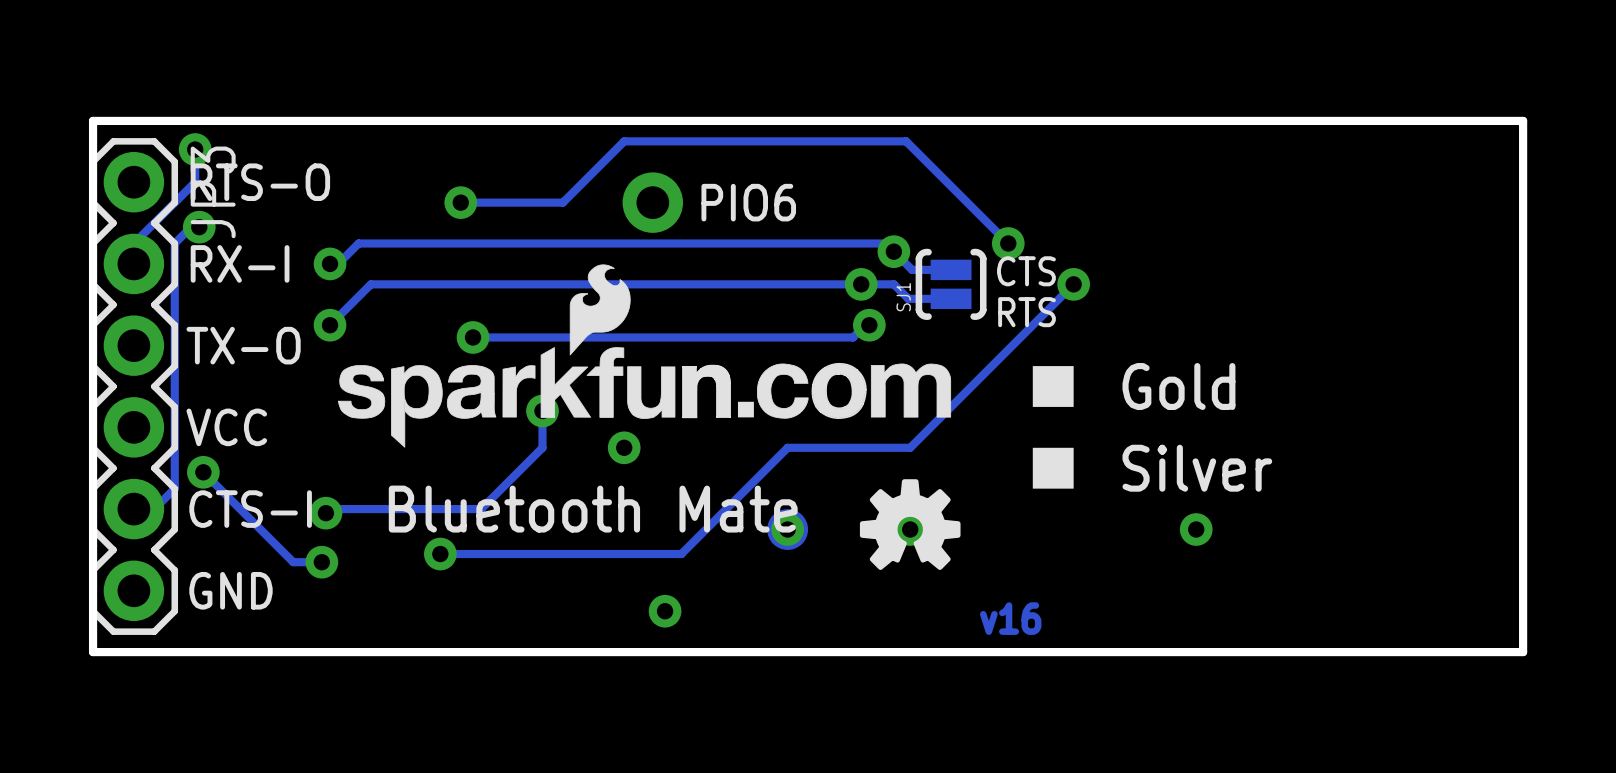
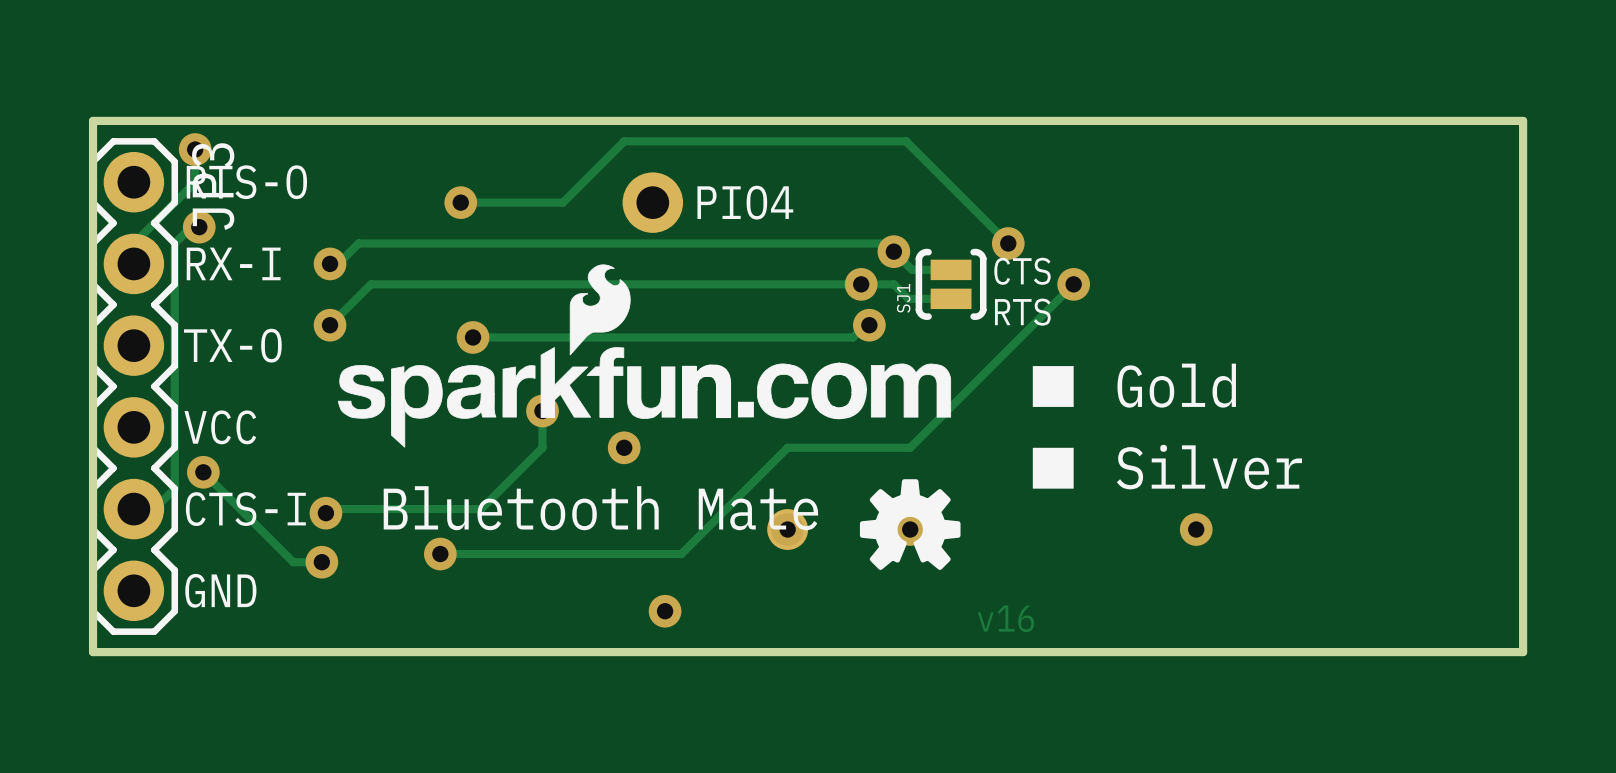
text: PIO6 (748, 202) -> PIO4 (745, 202)

